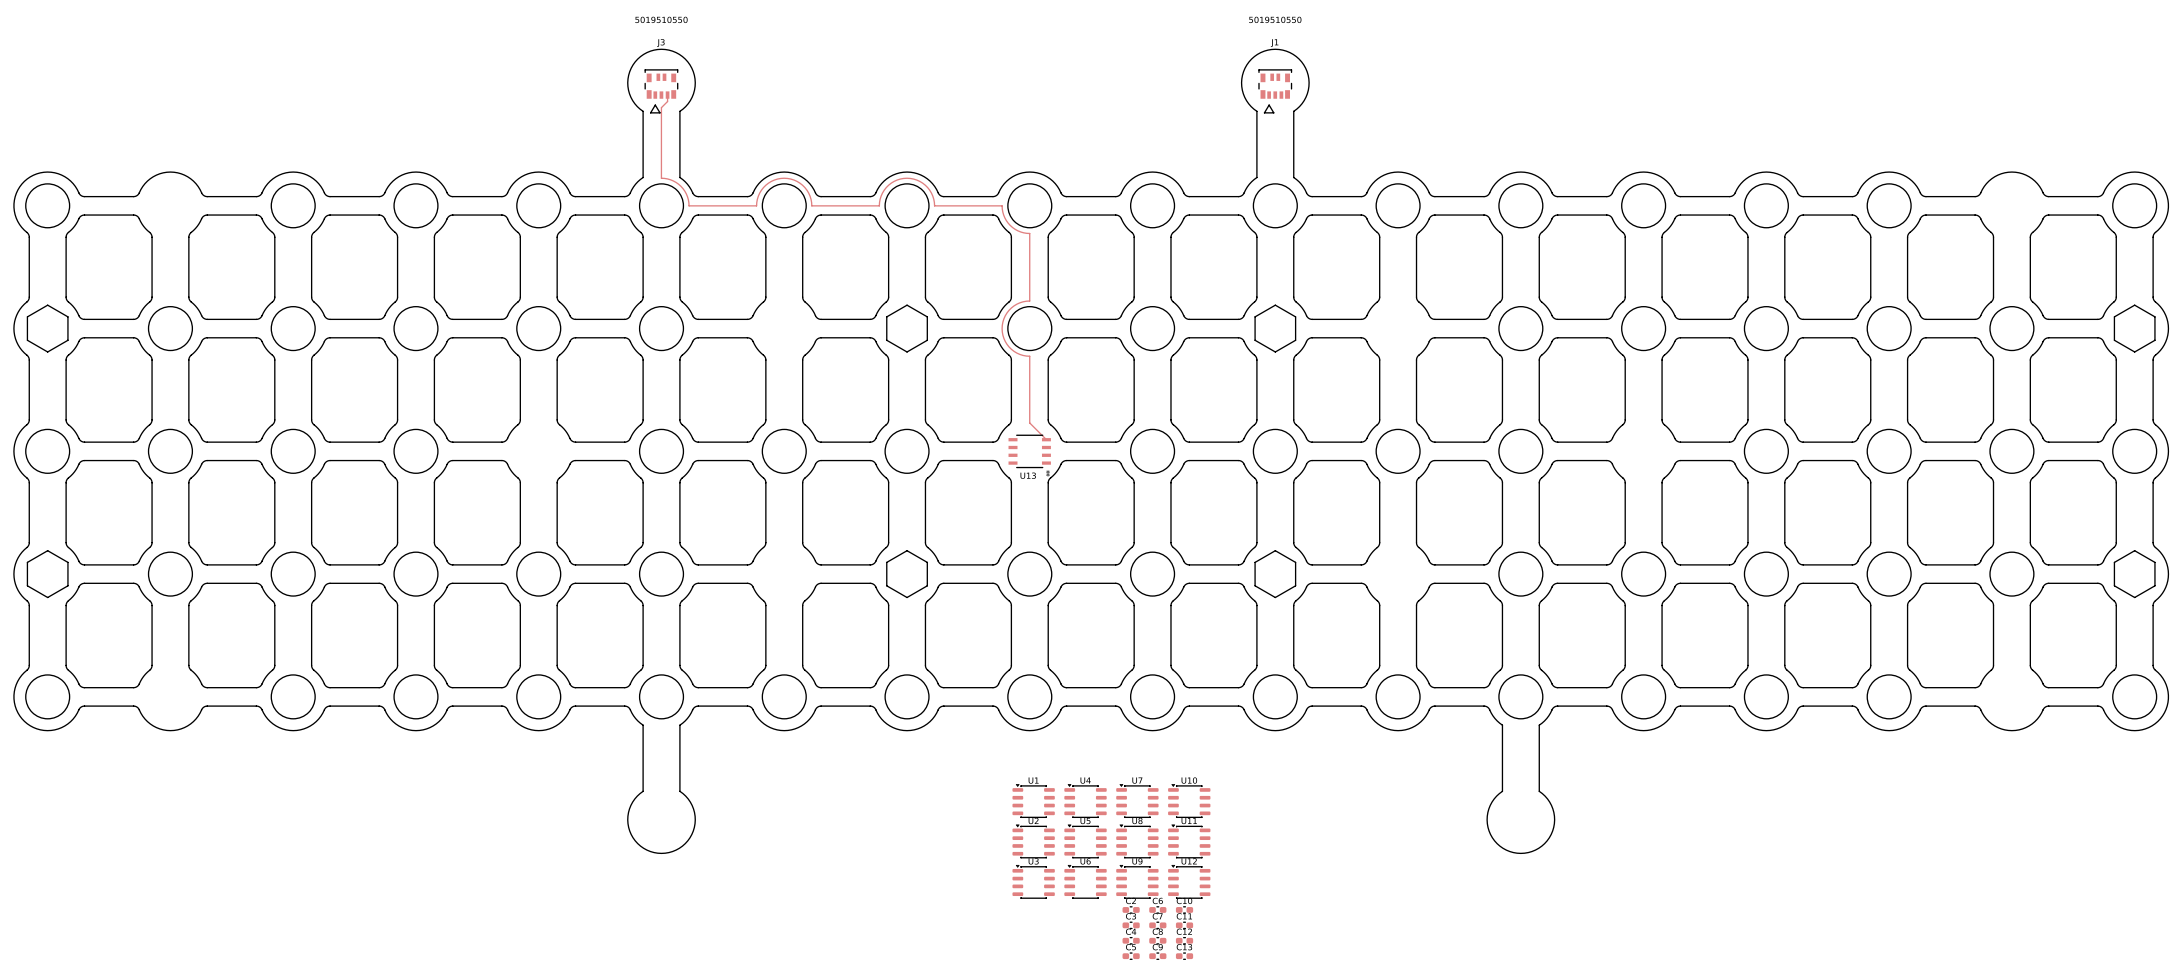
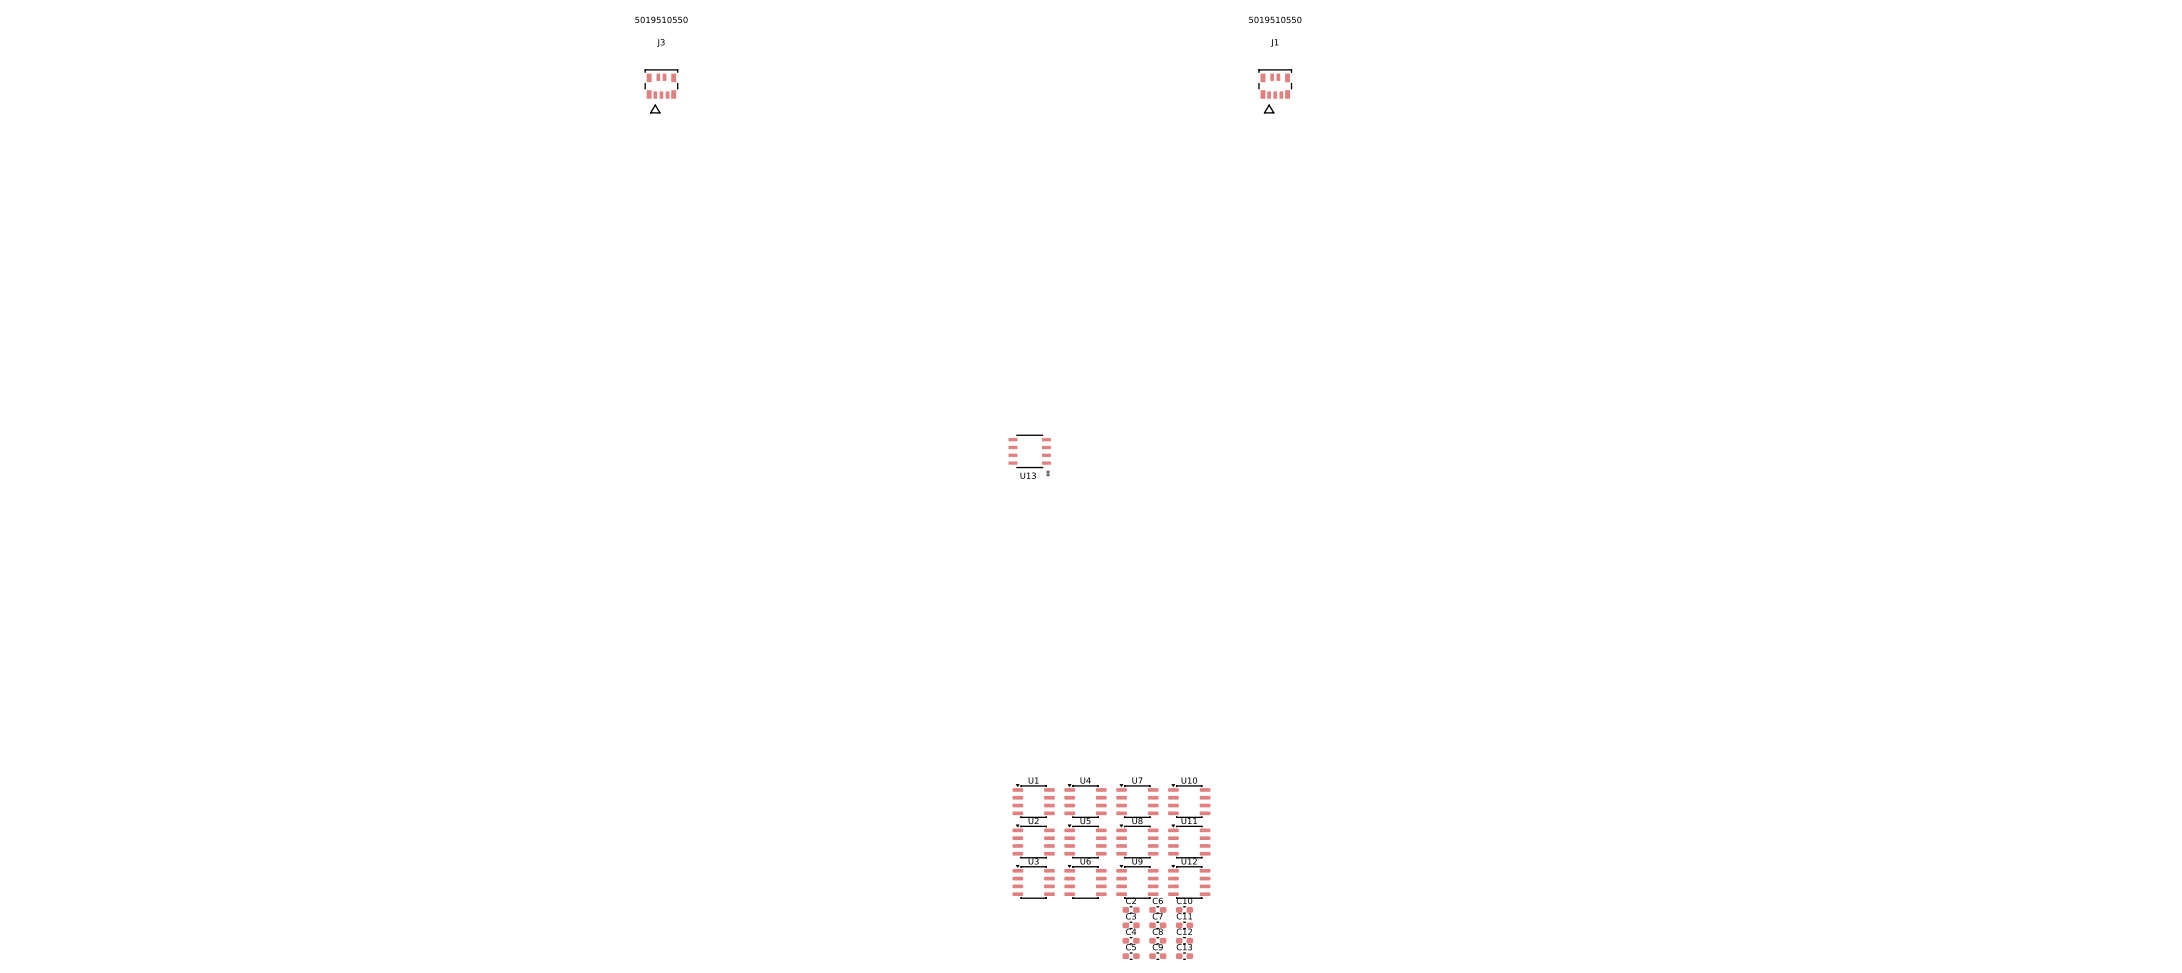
track: (667, 95) (667, 101) (661, 107) (661, 178) (673, 180) (680, 186) (686, 193) (689, 205) (756, 205) (758, 196) (763, 187) (774, 180) (784, 178) (793, 180) (802, 185) (810, 196) (811, 205) (879, 205) (881, 196) (886, 187) (897, 180) (906, 178) (916, 180) (925, 185) (932, 196) (934, 205) (1002, 205) (1004, 217) (1010, 225) (1017, 230) (1029, 233) (1029, 301) (1019, 302) (1009, 310) (1002, 322) (1002, 335) (1011, 349) (1019, 354) (1029, 356) (1029, 422) (1046, 439) -> none
board edge: (643, 111) (643, 177) (625, 196) (574, 196) (558, 178) (549, 173) (538, 172) (528, 173) (518, 178) (506, 194) (501, 196) (451, 196) (436, 178) (426, 173) (415, 172) (405, 173) (395, 178) (383, 194) (379, 196) (328, 196) (313, 178) (303, 173) (293, 172) (282, 173) (273, 178) (260, 194) (256, 196) (205, 196) (190, 178) (174, 172) (163, 172) (153, 176) (134, 196) (83, 196) (67, 178) (51, 172) (36, 173) (24, 181) (16, 193) (13, 207) (17, 221) (29, 236) (29, 297) (18, 312) (13, 328) (18, 344) (29, 359) (29, 419) (16, 438) (13, 451) (18, 467) (29, 482) (29, 542) (16, 560) (13, 574) (18, 590) (29, 604) (29, 666) (17, 681) (13, 695) (16, 709) (24, 721) (36, 728) (51, 730) (67, 723) (83, 706) (134, 706) (153, 725) (163, 729) (174, 730) (190, 723) (205, 706) (256, 706) (260, 708) (273, 723) (282, 728) (293, 730) (303, 728) (313, 723) (328, 706) (379, 706) (383, 708) (395, 723) (405, 728) (415, 730) (426, 728) (436, 723) (451, 706) (501, 706) (506, 708) (518, 723) (528, 728) (538, 730) (549, 728) (558, 723) (574, 706) (626, 706) (643, 725) (643, 791) (630, 805) (627, 816) (628, 827) (633, 837) (640, 846) (650, 851) (661, 853) (672, 851) (682, 846) (689, 837) (694, 827) (695, 816) (692, 805) (679, 791) (679, 725) (696, 706) (748, 706) (764, 723) (773, 728) (784, 730) (794, 728) (804, 723) (819, 706) (870, 706) (874, 708) (886, 723) (896, 728) (907, 730) (917, 728) (927, 723) (942, 706) (993, 706) (997, 708) (1009, 723) (1019, 728) (1029, 730) (1040, 728) (1050, 723) (1065, 706) (1115, 706) (1120, 708) (1132, 723) (1141, 728) (1152, 730) (1163, 728) (1172, 723) (1187, 706) (1238, 706) (1243, 708) (1255, 723) (1264, 728) (1275, 730) (1285, 728) (1295, 723) (1310, 706) (1361, 706) (1365, 708) (1377, 723) (1387, 728) (1398, 730) (1408, 728) (1418, 723) (1433, 706) (1484, 706) (1502, 725) (1502, 791) (1490, 805) (1487, 816) (1488, 827) (1492, 837) (1499, 846) (1509, 851) (1520, 853) (1531, 851) (1541, 846) (1549, 837) (1553, 827) (1554, 816) (1551, 805) (1539, 791) (1539, 725) (1556, 706) (1608, 706) (1623, 723) (1632, 728) (1643, 730) (1654, 728) (1663, 723) (1675, 708) (1680, 706) (1730, 706) (1746, 723) (1755, 728) (1766, 730) (1777, 728) (1786, 723) (1798, 708) (1803, 706) (1853, 706) (1868, 723) (1878, 728) (1889, 730) (1899, 728) (1909, 723) (1921, 708) (1925, 706) (1976, 706) (1991, 723) (2001, 728) (2011, 730) (2022, 728) (2032, 723) (2044, 708) (2048, 706) (2099, 706) (2114, 723) (2124, 728) (2134, 730) (2152, 725) (2160, 718) (2166, 709) (2168, 698) (2167, 688) (2162, 678) (2153, 666) (2153, 604) (2164, 590) (2168, 574) (2164, 557) (2153, 543) (2153, 482) (2165, 464) (2168, 451) (2164, 435) (2153, 420) (2153, 360) (2165, 341) (2168, 328) (2164, 312) (2153, 297) (2153, 237) (2164, 221) (2168, 203) (2162, 186) (2155, 178) (2145, 173) (2134, 172) (2120, 175) (2111, 181) (2102, 194) (2097, 196) (2047, 196) (2032, 178) (2022, 173) (2011, 172) (2001, 173) (1991, 178) (1979, 194) (1975, 196) (1924, 196) (1909, 178) (1899, 173) (1889, 172) (1878, 173) (1868, 178) (1853, 196) (1802, 196) (1798, 194) (1786, 178) (1777, 173) (1766, 172) (1755, 173) (1746, 178) (1730, 196) (1680, 196) (1675, 194) (1663, 178) (1654, 173) (1643, 172) (1632, 173) (1623, 178) (1608, 196) (1557, 196) (1553, 194) (1541, 178) (1531, 173) (1520, 172) (1510, 173) (1500, 178) (1485, 196) (1434, 196) (1430, 194) (1418, 178) (1408, 173) (1398, 172) (1387, 173) (1377, 178) (1362, 196) (1311, 196) (1293, 177) (1293, 111) (1302, 103) (1307, 93) (1308, 75) (1303, 64) (1296, 56) (1286, 51) (1275, 49) (1264, 51) (1254, 56) (1246, 64) (1242, 75) (1243, 93) (1248, 103) (1256, 111) (1256, 177) (1239, 196) (1187, 196) (1172, 178) (1163, 173) (1152, 172) (1141, 173) (1132, 178) (1117, 196) (1065, 196) (1062, 194) (1050, 178) (1040, 173) (1029, 172) (1019, 173) (1009, 178) (994, 196) (943, 196) (939, 194) (927, 178) (917, 173) (907, 172) (896, 173) (886, 178) (871, 196) (821, 196) (816, 194) (804, 178) (794, 173) (784, 172) (773, 173) (764, 178) (748, 196) (697, 196) (679, 177) (679, 111) (692, 97) (695, 82) (691, 68) (679, 54) (668, 50) (654, 50) (640, 56) (633, 64) (628, 75) (628, 90) (632, 100) (643, 111) -> none
round board edge: [25, 183, 70, 228] -> none
round board edge: [271, 183, 316, 228] -> none
round board edge: [393, 183, 439, 228] -> none
round board edge: [516, 183, 561, 228] -> none
round board edge: [639, 183, 684, 228] -> none
round board edge: [762, 183, 807, 228] -> none
round board edge: [884, 183, 930, 228] -> none
round board edge: [1007, 183, 1052, 228] -> none
round board edge: [1130, 183, 1175, 228] -> none
round board edge: [1253, 183, 1298, 228] -> none
round board edge: [1376, 183, 1421, 228] -> none
round board edge: [1498, 183, 1543, 228] -> none
round board edge: [1621, 183, 1666, 228] -> none
round board edge: [1744, 183, 1789, 228] -> none
round board edge: [1867, 183, 1912, 228] -> none
round board edge: [2112, 183, 2157, 228] -> none
board edge: (84, 215) (135, 215) (151, 234) (151, 298) (136, 318) (83, 319) (66, 299) (66, 235) (80, 216) (84, 215) -> none
board edge: (207, 215) (257, 215) (274, 234) (274, 298) (259, 318) (205, 319) (189, 299) (189, 235) (202, 216) (207, 215) -> none
board edge: (330, 215) (380, 215) (396, 234) (397, 298) (381, 318) (328, 319) (312, 299) (311, 235) (325, 216) (330, 215) -> none
board edge: (452, 215) (503, 215) (519, 234) (520, 298) (504, 318) (451, 319) (435, 299) (434, 235) (448, 216) (452, 215) -> none
board edge: (575, 215) (626, 215) (642, 234) (642, 298) (627, 318) (574, 319) (557, 299) (557, 235) (571, 216) (575, 215) -> none
board edge: (698, 215) (748, 215) (765, 234) (765, 298) (750, 318) (696, 319) (680, 299) (680, 235) (693, 216) (698, 215) -> none
board edge: (821, 215) (871, 215) (888, 234) (888, 298) (872, 318) (819, 319) (803, 299) (802, 235) (816, 216) (821, 215) -> none
board edge: (943, 215) (994, 215) (1010, 234) (1011, 298) (995, 318) (942, 319) (926, 299) (925, 235) (939, 216) (943, 215) -> none
board edge: (1066, 215) (1117, 215) (1133, 234) (1134, 298) (1118, 318) (1065, 319) (1048, 299) (1048, 235) (1062, 216) (1066, 215) -> none
board edge: (1189, 215) (1239, 215) (1256, 234) (1256, 298) (1241, 318) (1187, 319) (1171, 299) (1171, 235) (1184, 216) (1189, 215) -> none
board edge: (1312, 215) (1362, 215) (1379, 234) (1379, 298) (1364, 318) (1310, 319) (1294, 299) (1293, 235) (1307, 216) (1312, 215) -> none
board edge: (1434, 215) (1485, 215) (1501, 234) (1502, 298) (1486, 318) (1433, 319) (1417, 299) (1416, 235) (1430, 216) (1434, 215) -> none
board edge: (1557, 215) (1608, 215) (1624, 234) (1625, 298) (1609, 318) (1556, 319) (1539, 299) (1539, 235) (1553, 216) (1557, 215) -> none
board edge: (1680, 215) (1730, 215) (1747, 234) (1747, 298) (1732, 318) (1679, 319) (1662, 299) (1662, 235) (1675, 216) (1680, 215) -> none
board edge: (1803, 215) (1853, 215) (1870, 234) (1870, 298) (1855, 318) (1801, 319) (1785, 299) (1784, 235) (1798, 216) (1803, 215) -> none
board edge: (1925, 215) (1976, 215) (1992, 234) (1993, 298) (1977, 318) (1924, 319) (1908, 299) (1907, 235) (1921, 216) (1925, 215) -> none
board edge: (2048, 215) (2099, 215) (2115, 234) (2116, 298) (2100, 318) (2047, 319) (2030, 299) (2030, 235) (2044, 216) (2048, 215) -> none
board edge: (47, 305) (27, 316) (27, 340) (47, 351) (67, 340) (67, 316) (47, 305) -> none
board edge: (907, 305) (886, 316) (886, 340) (907, 351) (927, 340) (927, 316) (907, 305) -> none
board edge: (1275, 305) (1295, 316) (1295, 340) (1275, 351) (1255, 340) (1255, 316) (1275, 305) -> none
board edge: (2134, 305) (2114, 316) (2114, 340) (2134, 351) (2154, 340) (2154, 316) (2134, 305) -> none
round board edge: [148, 306, 193, 351] -> none
round board edge: [271, 306, 316, 351] -> none
round board edge: [393, 306, 439, 351] -> none
round board edge: [516, 306, 561, 351] -> none
round board edge: [639, 306, 684, 351] -> none
round board edge: [1007, 306, 1052, 351] -> none
round board edge: [1130, 306, 1175, 351] -> none
round board edge: [1498, 306, 1543, 351] -> none
round board edge: [1621, 306, 1666, 351] -> none
round board edge: [1744, 306, 1789, 351] -> none
round board edge: [1867, 306, 1912, 351] -> none
round board edge: [1989, 306, 2035, 351] -> none
board edge: (84, 337) (135, 337) (151, 357) (151, 421) (136, 441) (83, 441) (66, 422) (66, 358) (80, 339) (84, 337) -> none
board edge: (207, 337) (257, 337) (274, 357) (274, 421) (259, 441) (205, 441) (189, 422) (189, 358) (202, 339) (207, 337) -> none
board edge: (330, 337) (380, 337) (396, 357) (397, 421) (381, 441) (328, 441) (312, 422) (311, 358) (325, 339) (330, 337) -> none
board edge: (452, 337) (503, 337) (519, 357) (520, 421) (504, 441) (451, 441) (435, 422) (434, 358) (448, 339) (452, 337) -> none
board edge: (575, 337) (626, 337) (642, 357) (642, 421) (627, 441) (574, 441) (557, 422) (557, 358) (571, 339) (575, 337) -> none
board edge: (698, 337) (748, 337) (765, 357) (765, 421) (750, 441) (696, 441) (680, 422) (680, 358) (693, 339) (698, 337) -> none
board edge: (821, 337) (871, 337) (888, 357) (888, 421) (872, 441) (819, 441) (803, 422) (802, 358) (816, 339) (821, 337) -> none
board edge: (943, 337) (994, 337) (1010, 357) (1011, 421) (995, 441) (942, 441) (926, 422) (925, 358) (939, 339) (943, 337) -> none
board edge: (1066, 337) (1117, 337) (1133, 357) (1134, 421) (1118, 441) (1065, 441) (1048, 422) (1048, 358) (1062, 339) (1066, 337) -> none
board edge: (1189, 337) (1239, 337) (1256, 357) (1256, 421) (1241, 441) (1187, 441) (1171, 422) (1171, 358) (1184, 339) (1189, 337) -> none
board edge: (1312, 337) (1362, 337) (1379, 357) (1379, 421) (1364, 441) (1310, 441) (1294, 422) (1293, 358) (1307, 339) (1312, 337) -> none
board edge: (1434, 337) (1485, 337) (1501, 357) (1502, 421) (1486, 441) (1433, 441) (1417, 422) (1416, 358) (1430, 339) (1434, 337) -> none
board edge: (1557, 337) (1608, 337) (1624, 357) (1625, 421) (1609, 441) (1556, 441) (1539, 422) (1539, 358) (1553, 339) (1557, 337) -> none
board edge: (1680, 337) (1730, 337) (1747, 357) (1747, 421) (1732, 441) (1679, 441) (1662, 422) (1662, 358) (1675, 339) (1680, 337) -> none
board edge: (1803, 337) (1853, 337) (1870, 357) (1870, 421) (1855, 441) (1801, 441) (1785, 422) (1784, 358) (1798, 339) (1803, 337) -> none
board edge: (1925, 337) (1976, 337) (1992, 357) (1993, 421) (1977, 441) (1924, 441) (1908, 422) (1907, 358) (1921, 339) (1925, 337) -> none
board edge: (2048, 337) (2099, 337) (2115, 357) (2116, 421) (2100, 441) (2047, 441) (2030, 422) (2030, 358) (2044, 339) (2048, 337) -> none
round board edge: [25, 429, 70, 474] -> none
round board edge: [148, 429, 193, 474] -> none
round board edge: [271, 429, 316, 474] -> none
round board edge: [393, 429, 439, 474] -> none
round board edge: [639, 429, 684, 474] -> none
round board edge: [762, 429, 807, 474] -> none
round board edge: [884, 429, 930, 474] -> none
round board edge: [1130, 429, 1175, 474] -> none
round board edge: [1253, 429, 1298, 474] -> none
round board edge: [1376, 429, 1421, 474] -> none
round board edge: [1498, 429, 1543, 474] -> none
round board edge: [1744, 429, 1789, 474] -> none
round board edge: [1867, 429, 1912, 474] -> none
round board edge: [1989, 429, 2035, 474] -> none
round board edge: [2112, 429, 2157, 474] -> none
board edge: (84, 460) (135, 460) (151, 480) (151, 544) (136, 564) (83, 564) (66, 545) (66, 481) (80, 462) (84, 460) -> none
board edge: (207, 460) (257, 460) (274, 480) (274, 544) (259, 564) (205, 564) (189, 545) (189, 481) (202, 462) (207, 460) -> none
board edge: (330, 460) (380, 460) (396, 480) (397, 544) (381, 564) (328, 564) (312, 545) (311, 481) (325, 462) (330, 460) -> none
board edge: (452, 460) (503, 460) (519, 480) (520, 544) (504, 564) (451, 564) (435, 545) (434, 481) (448, 462) (452, 460) -> none
board edge: (575, 460) (626, 460) (642, 480) (642, 544) (627, 564) (574, 564) (557, 545) (557, 481) (571, 462) (575, 460) -> none
board edge: (698, 460) (748, 460) (765, 480) (765, 544) (750, 564) (696, 564) (680, 545) (680, 481) (693, 462) (698, 460) -> none
board edge: (821, 460) (871, 460) (888, 480) (888, 544) (872, 564) (819, 564) (803, 545) (802, 481) (816, 462) (821, 460) -> none
board edge: (943, 460) (994, 460) (1010, 480) (1011, 544) (995, 564) (942, 564) (926, 545) (925, 481) (939, 462) (943, 460) -> none
board edge: (1066, 460) (1117, 460) (1133, 480) (1134, 544) (1118, 564) (1065, 564) (1048, 545) (1048, 481) (1062, 462) (1066, 460) -> none
board edge: (1189, 460) (1239, 460) (1256, 480) (1256, 544) (1241, 564) (1187, 564) (1171, 545) (1171, 481) (1184, 462) (1189, 460) -> none
board edge: (1312, 460) (1362, 460) (1379, 480) (1379, 544) (1364, 564) (1310, 564) (1294, 545) (1293, 481) (1307, 462) (1312, 460) -> none
board edge: (1434, 460) (1485, 460) (1501, 480) (1502, 544) (1486, 564) (1433, 564) (1417, 545) (1416, 481) (1430, 462) (1434, 460) -> none
board edge: (1557, 460) (1608, 460) (1624, 480) (1625, 544) (1609, 564) (1556, 564) (1539, 545) (1539, 481) (1553, 462) (1557, 460) -> none
board edge: (1680, 460) (1730, 460) (1747, 480) (1747, 544) (1732, 564) (1679, 564) (1662, 545) (1662, 481) (1675, 462) (1680, 460) -> none
board edge: (1803, 460) (1853, 460) (1870, 480) (1870, 544) (1855, 564) (1801, 564) (1785, 545) (1784, 481) (1798, 462) (1803, 460) -> none
board edge: (1925, 460) (1976, 460) (1992, 480) (1993, 544) (1977, 564) (1924, 564) (1908, 545) (1907, 481) (1921, 462) (1925, 460) -> none
board edge: (2048, 460) (2099, 460) (2115, 480) (2116, 544) (2100, 564) (2047, 564) (2030, 545) (2030, 481) (2044, 462) (2048, 460) -> none
board edge: (47, 550) (67, 562) (67, 585) (47, 597) (27, 585) (27, 562) (47, 550) -> none
board edge: (907, 550) (927, 562) (927, 585) (907, 597) (886, 585) (886, 562) (907, 550) -> none
board edge: (1275, 550) (1295, 562) (1295, 585) (1275, 597) (1255, 585) (1255, 562) (1275, 550) -> none
board edge: (2134, 550) (2114, 562) (2114, 585) (2134, 597) (2154, 585) (2154, 562) (2134, 550) -> none
round board edge: [148, 552, 193, 597] -> none
round board edge: [271, 552, 316, 597] -> none
round board edge: [393, 552, 439, 597] -> none
round board edge: [516, 552, 561, 597] -> none
round board edge: [639, 552, 684, 597] -> none
round board edge: [1007, 552, 1052, 597] -> none
round board edge: [1130, 552, 1175, 597] -> none
round board edge: [1498, 552, 1543, 597] -> none
round board edge: [1621, 552, 1666, 597] -> none
round board edge: [1744, 552, 1789, 597] -> none
round board edge: [1867, 552, 1912, 597] -> none
round board edge: [1989, 552, 2035, 597] -> none
board edge: (84, 583) (135, 583) (151, 602) (151, 666) (136, 687) (83, 687) (66, 668) (66, 604) (80, 585) (84, 583) -> none
board edge: (207, 583) (257, 583) (274, 602) (274, 666) (259, 687) (205, 687) (189, 668) (189, 604) (202, 585) (207, 583) -> none
board edge: (330, 583) (380, 583) (396, 602) (397, 666) (381, 687) (328, 687) (312, 668) (311, 604) (325, 585) (330, 583) -> none
board edge: (452, 583) (503, 583) (519, 602) (520, 666) (504, 687) (451, 687) (435, 668) (434, 604) (448, 585) (452, 583) -> none
board edge: (575, 583) (626, 583) (642, 602) (642, 666) (627, 687) (574, 687) (557, 668) (557, 604) (571, 585) (575, 583) -> none
board edge: (698, 583) (748, 583) (765, 602) (765, 666) (750, 687) (696, 687) (680, 668) (680, 604) (693, 585) (698, 583) -> none
board edge: (821, 583) (871, 583) (888, 602) (888, 666) (872, 687) (819, 687) (803, 668) (802, 604) (816, 585) (821, 583) -> none
board edge: (943, 583) (994, 583) (1010, 602) (1011, 666) (995, 687) (942, 687) (926, 668) (925, 604) (939, 585) (943, 583) -> none
board edge: (1066, 583) (1117, 583) (1133, 602) (1134, 666) (1118, 687) (1065, 687) (1048, 668) (1048, 604) (1062, 585) (1066, 583) -> none
board edge: (1189, 583) (1239, 583) (1256, 602) (1256, 666) (1241, 687) (1187, 687) (1171, 668) (1171, 604) (1184, 585) (1189, 583) -> none
board edge: (1312, 583) (1362, 583) (1379, 602) (1379, 666) (1364, 687) (1310, 687) (1294, 668) (1293, 604) (1307, 585) (1312, 583) -> none
board edge: (1434, 583) (1485, 583) (1501, 602) (1502, 666) (1486, 687) (1433, 687) (1417, 668) (1416, 604) (1430, 585) (1434, 583) -> none
board edge: (1557, 583) (1608, 583) (1624, 602) (1625, 666) (1609, 687) (1556, 687) (1539, 668) (1539, 604) (1553, 585) (1557, 583) -> none
board edge: (1680, 583) (1730, 583) (1747, 602) (1747, 666) (1732, 687) (1679, 687) (1662, 668) (1662, 604) (1675, 585) (1680, 583) -> none
board edge: (1803, 583) (1853, 583) (1870, 602) (1870, 666) (1855, 687) (1801, 687) (1785, 668) (1784, 604) (1798, 585) (1803, 583) -> none
board edge: (1925, 583) (1976, 583) (1992, 602) (1993, 666) (1977, 687) (1924, 687) (1908, 668) (1907, 604) (1921, 585) (1925, 583) -> none
board edge: (2048, 583) (2099, 583) (2115, 602) (2116, 666) (2100, 687) (2047, 687) (2030, 668) (2030, 604) (2044, 585) (2048, 583) -> none
round board edge: [25, 674, 70, 719] -> none
round board edge: [271, 674, 316, 719] -> none
round board edge: [393, 674, 439, 719] -> none
round board edge: [516, 674, 561, 719] -> none
round board edge: [639, 674, 684, 719] -> none
round board edge: [762, 674, 807, 719] -> none
round board edge: [884, 674, 930, 719] -> none
round board edge: [1007, 674, 1052, 719] -> none
round board edge: [1130, 674, 1175, 719] -> none
round board edge: [1253, 674, 1298, 719] -> none
round board edge: [1376, 674, 1421, 719] -> none
round board edge: [1498, 674, 1543, 719] -> none
round board edge: [1621, 674, 1666, 719] -> none
round board edge: [1744, 674, 1789, 719] -> none
round board edge: [1867, 674, 1912, 719] -> none
round board edge: [2112, 674, 2157, 719] -> none

